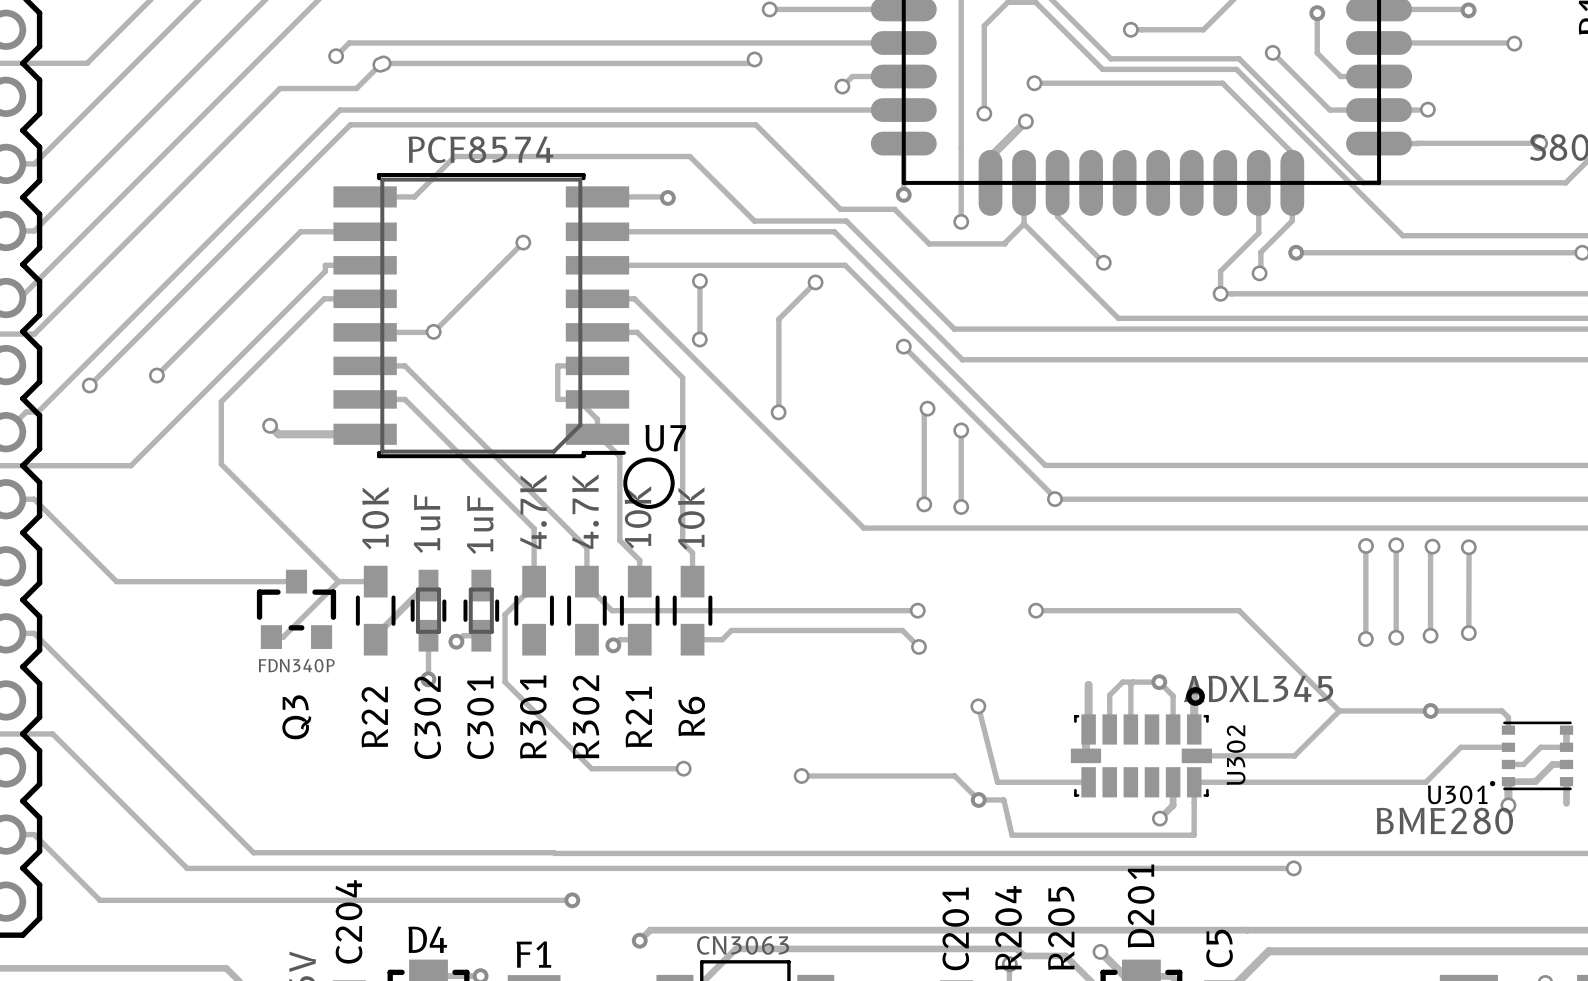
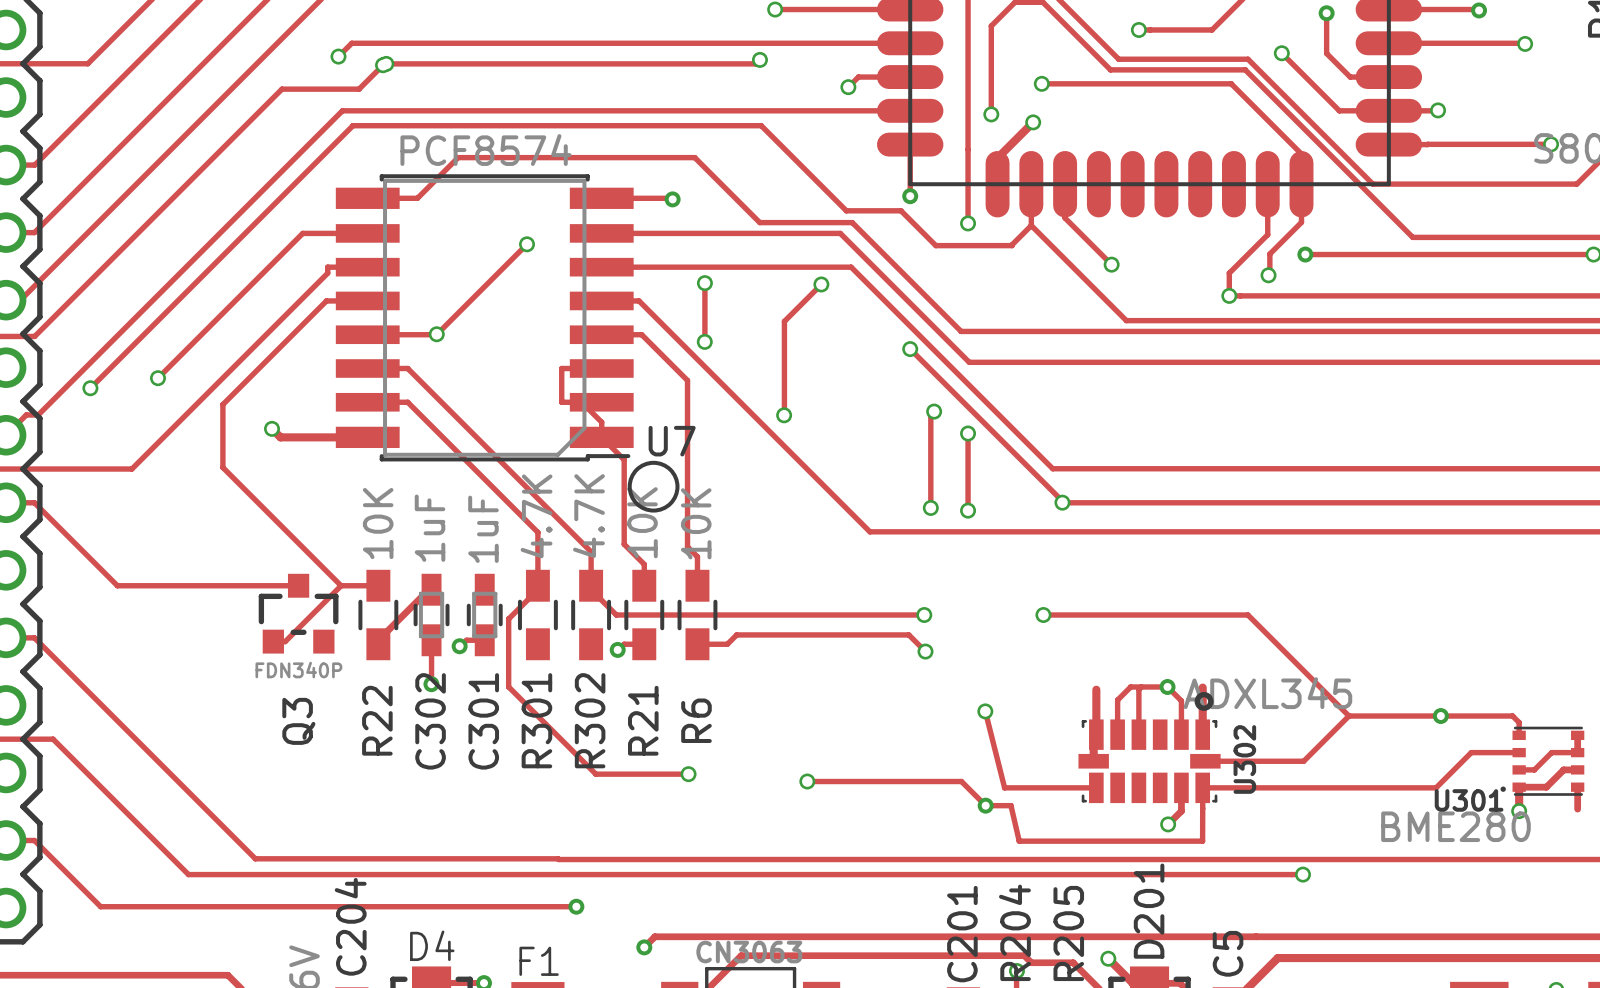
via: (1366, 545) -> none
track: (1396, 545) (1396, 637) -> none
via: (1396, 545) -> none
track: (1365, 546) (1365, 639) -> none
track: (1432, 546) (1430, 548) (1430, 635) -> none
via: (1432, 546) -> none
via: (1468, 547) -> none
track: (1469, 547) (1468, 633) -> none
via: (1468, 633) -> none
via: (1430, 635) -> none
via: (1396, 637) -> none
via: (1365, 639) -> none

